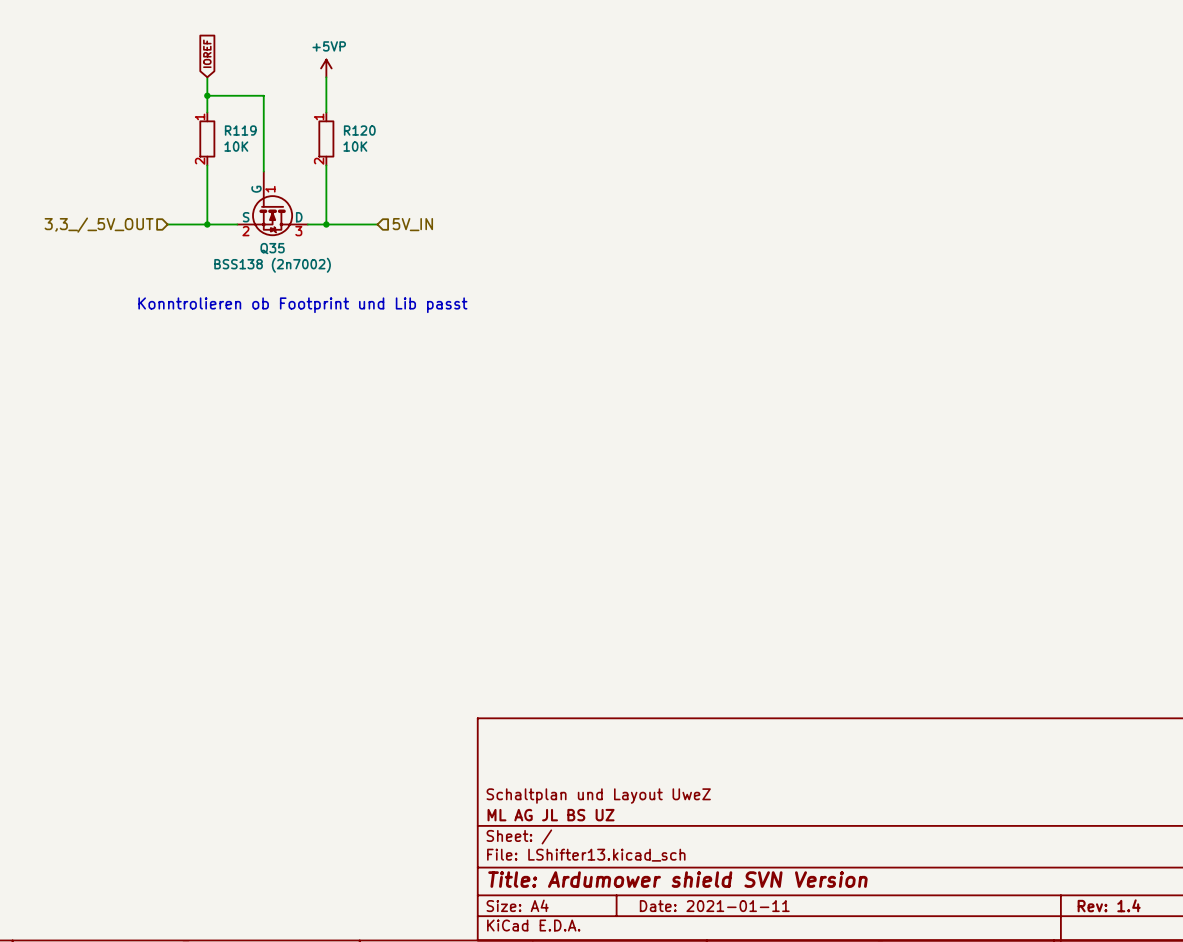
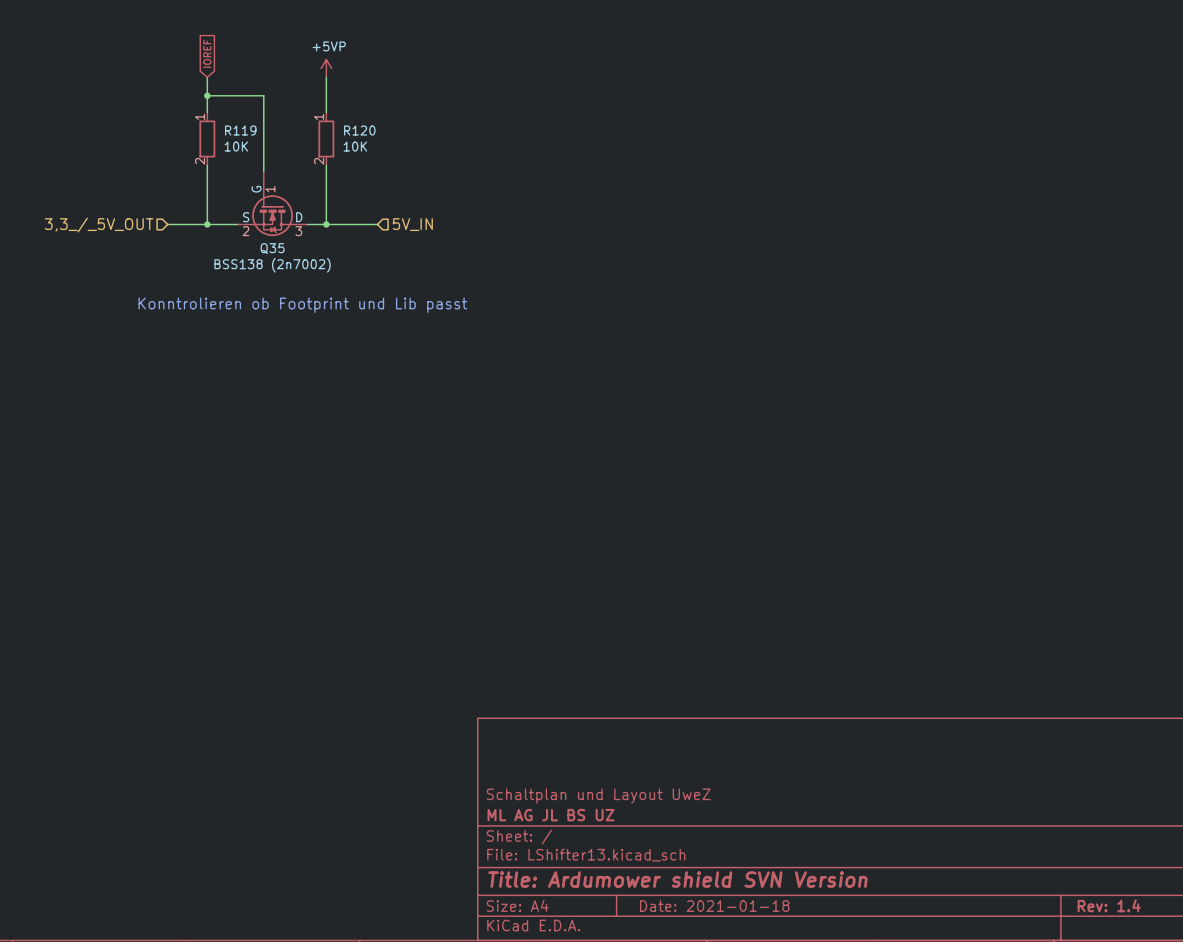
title block: Date: 2021-01-11 (714, 906) -> Date: 2021-01-18 (714, 906)

